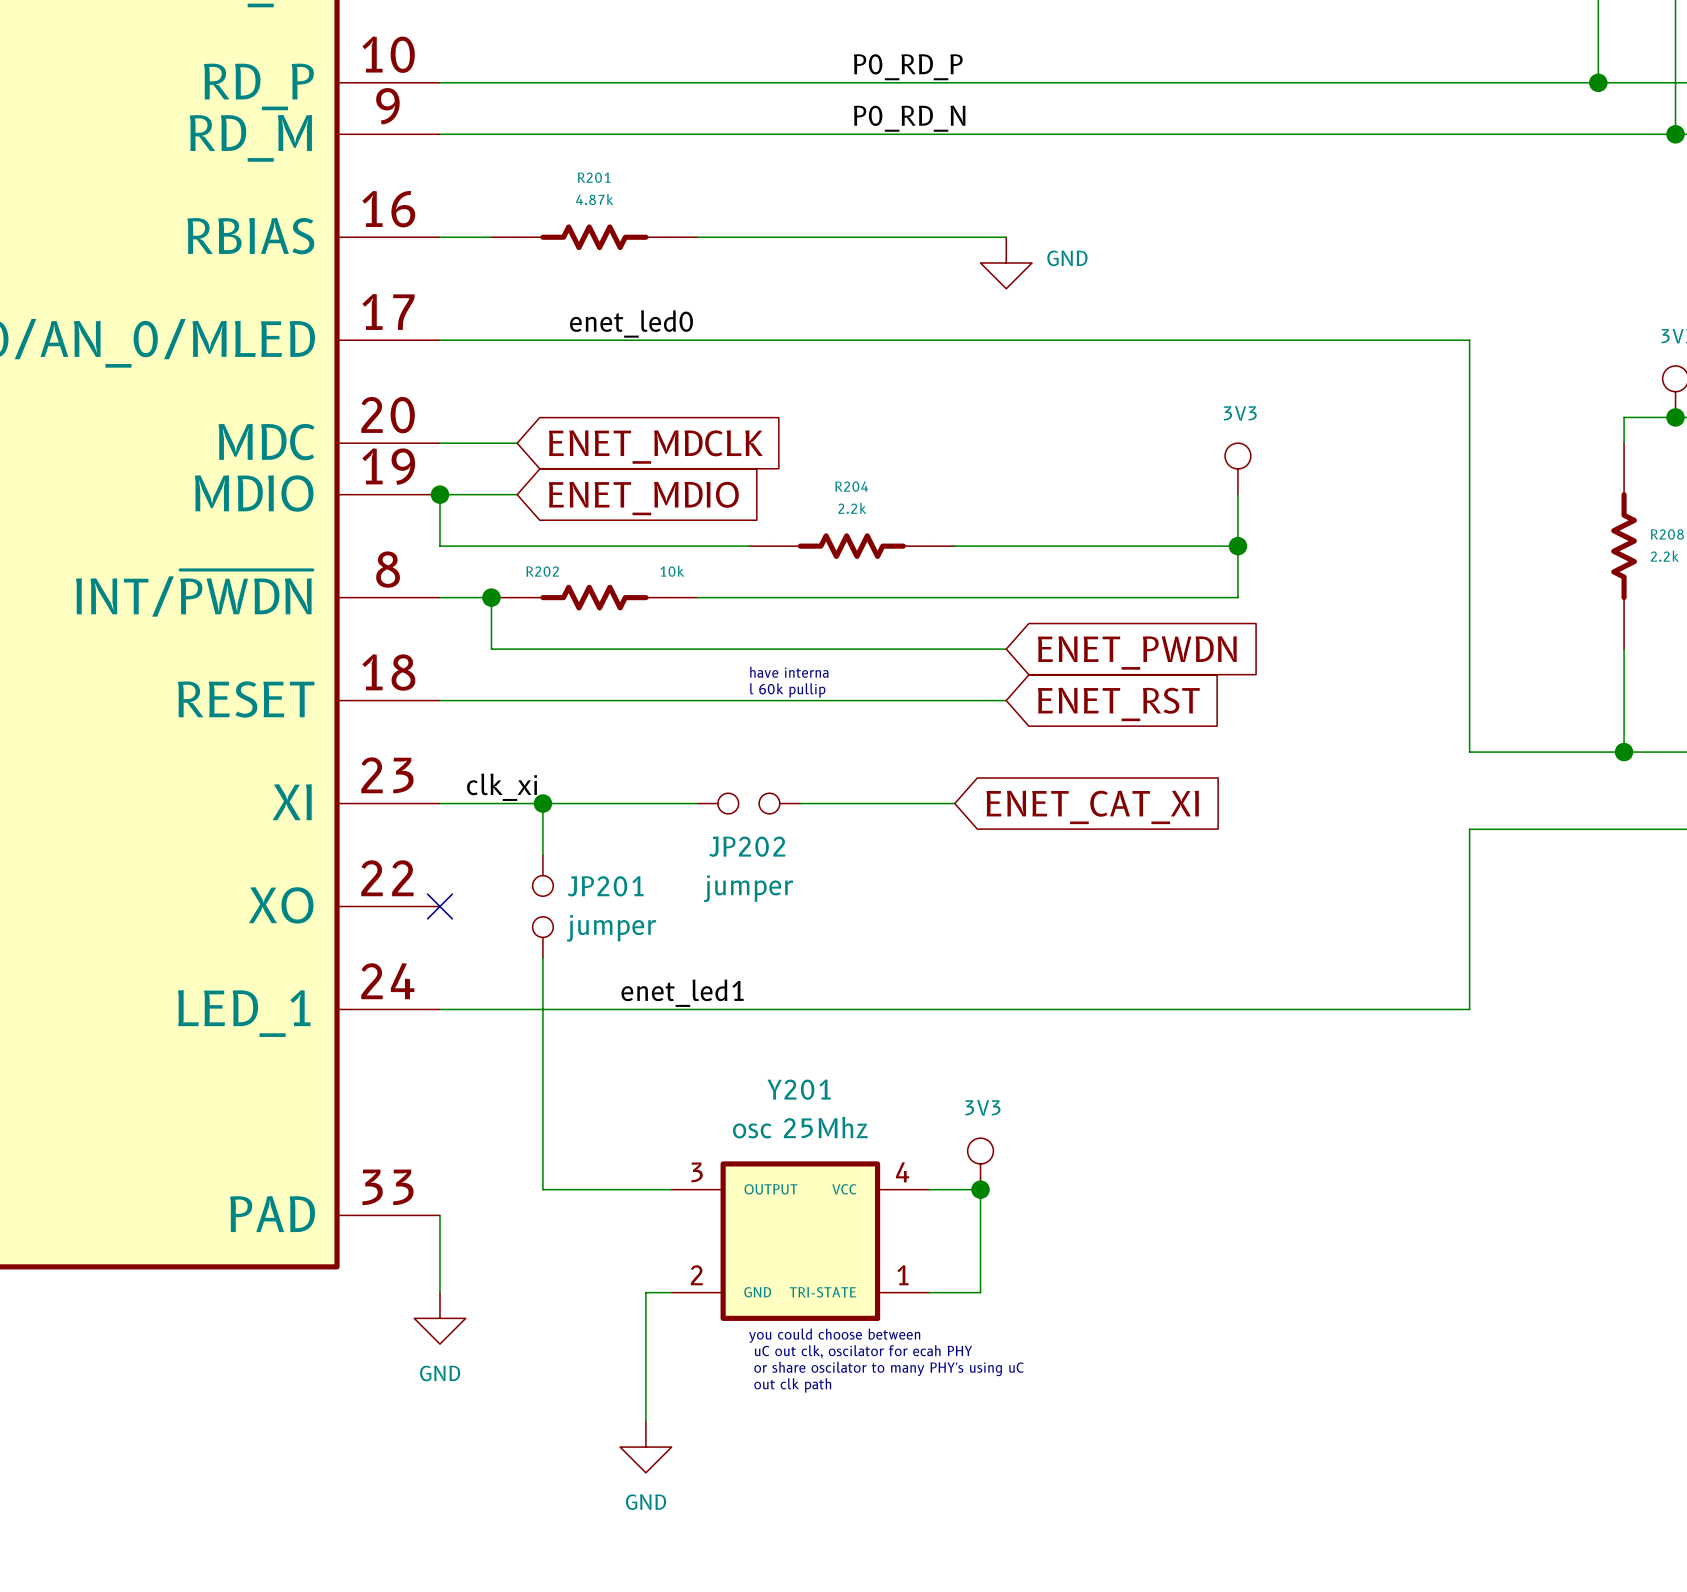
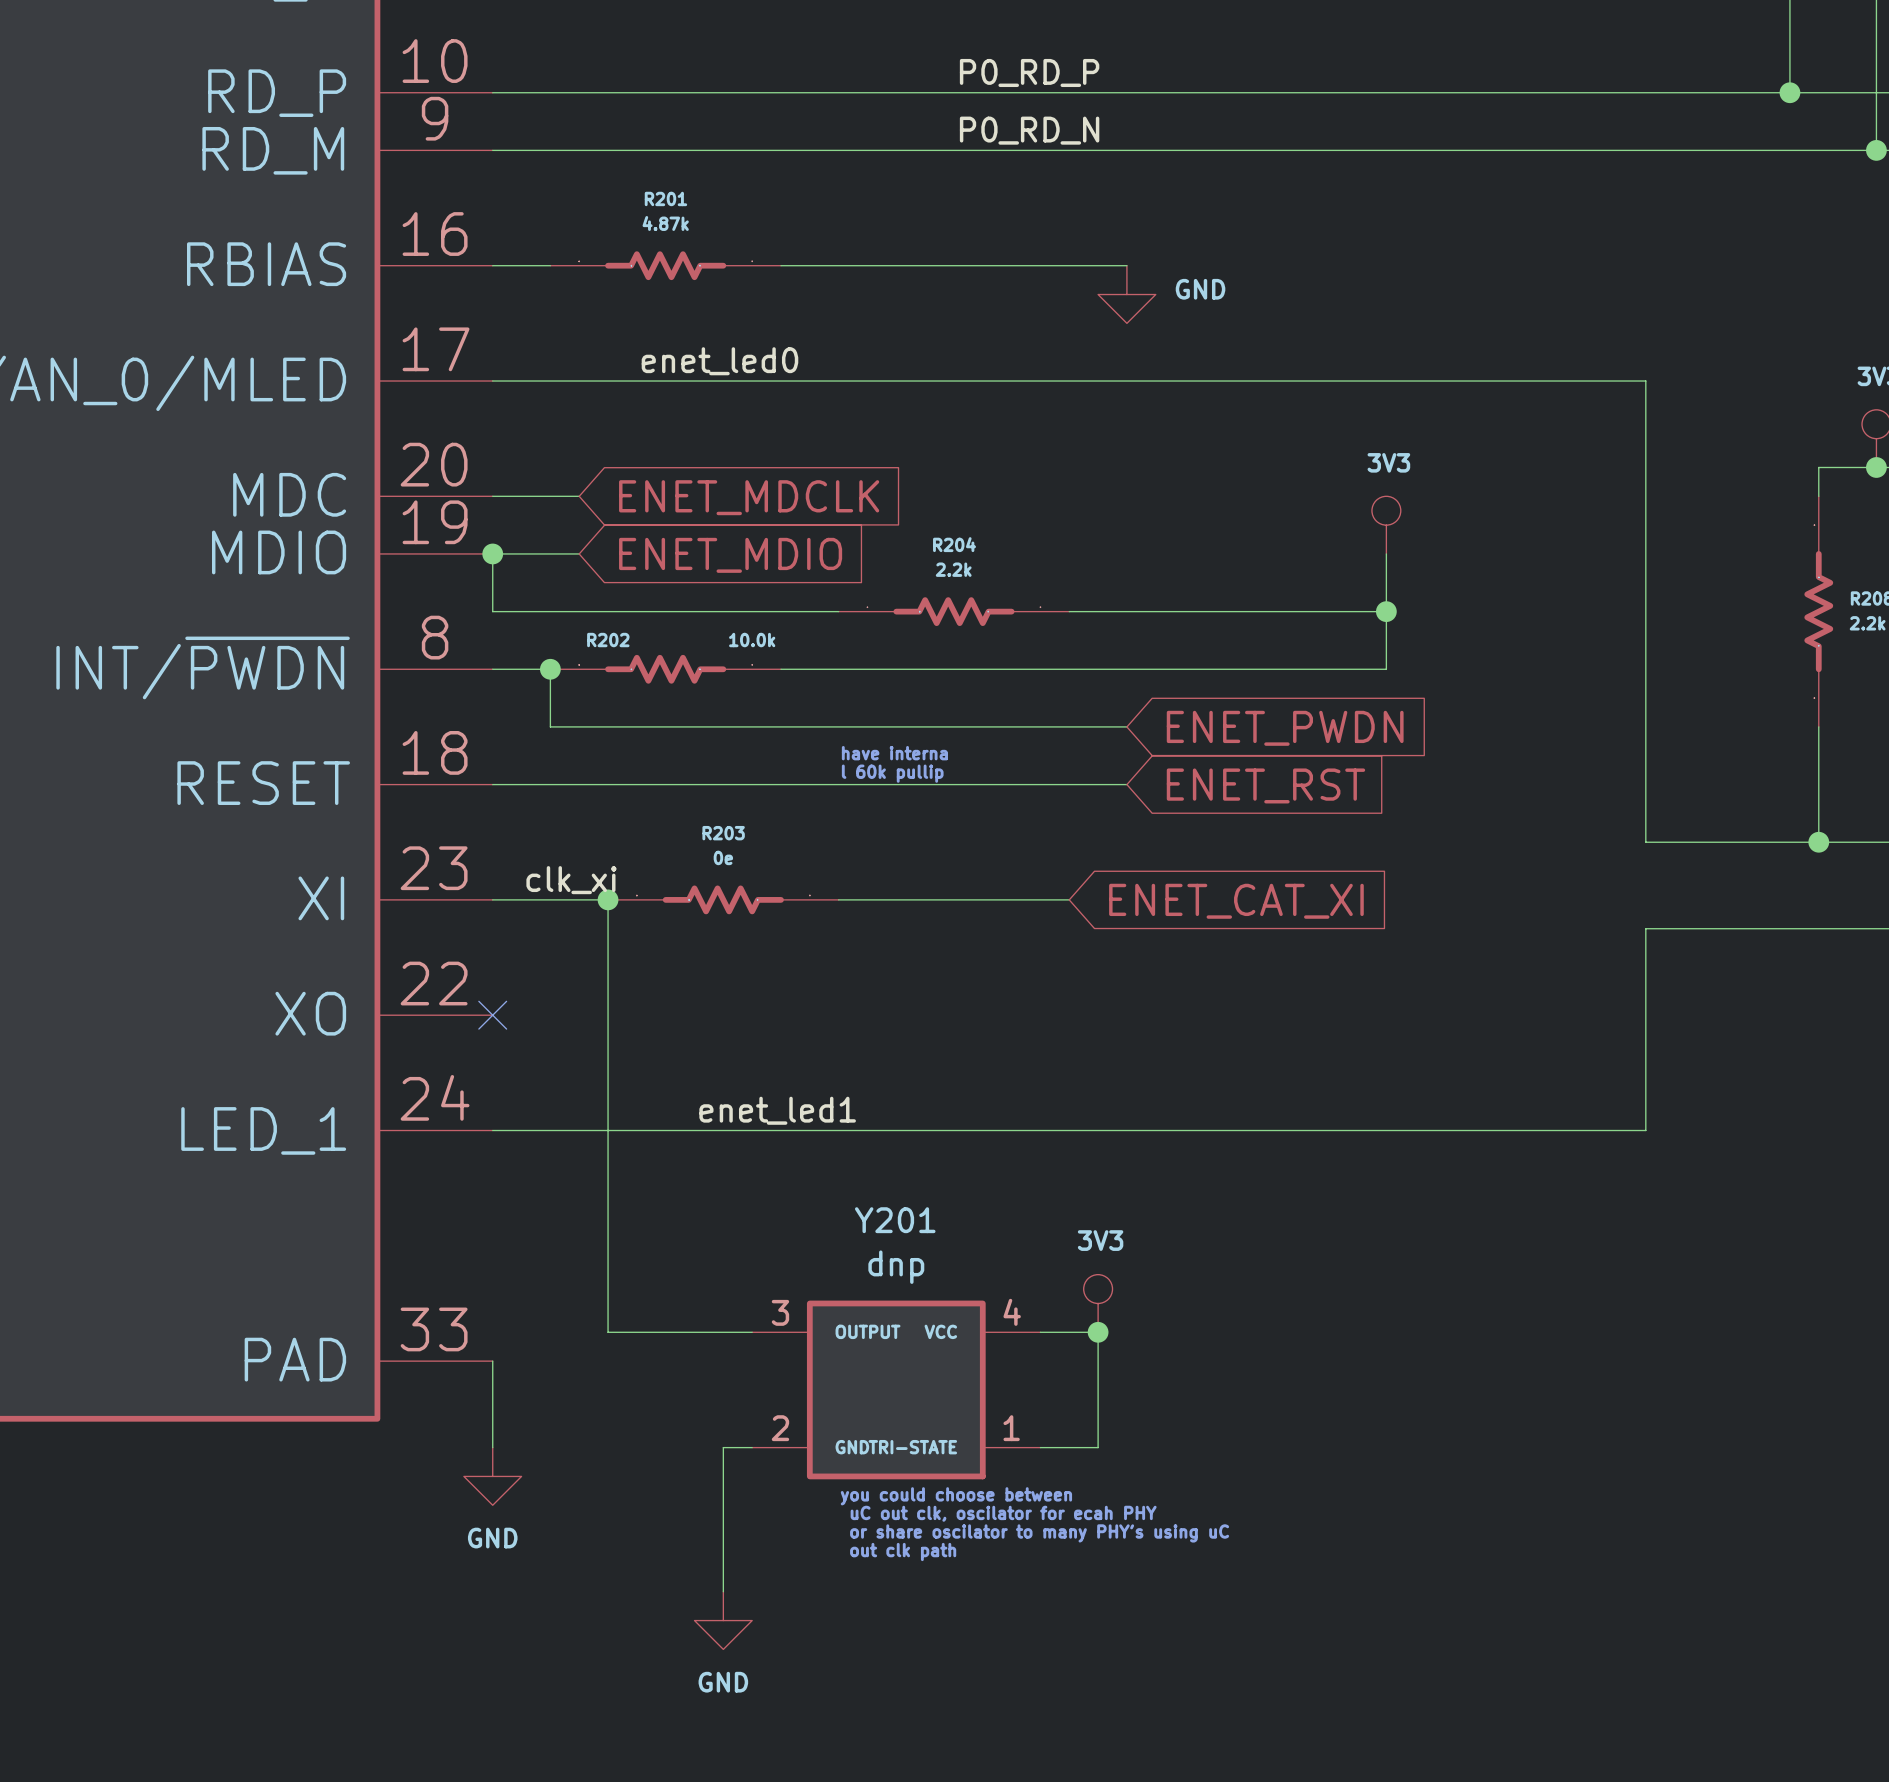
R202 value: 10k (672, 571) -> 10.0k (752, 640)
R203: none -> 0e (723, 899)
wire: none -> (838, 899) (896, 899)
JP202: jumper (748, 803) -> none
wire: none -> (608, 957) (608, 1072)
JP201: jumper (542, 906) -> none
Y201 value: osc 25Mhz (800, 1127) -> dnp (896, 1267)

